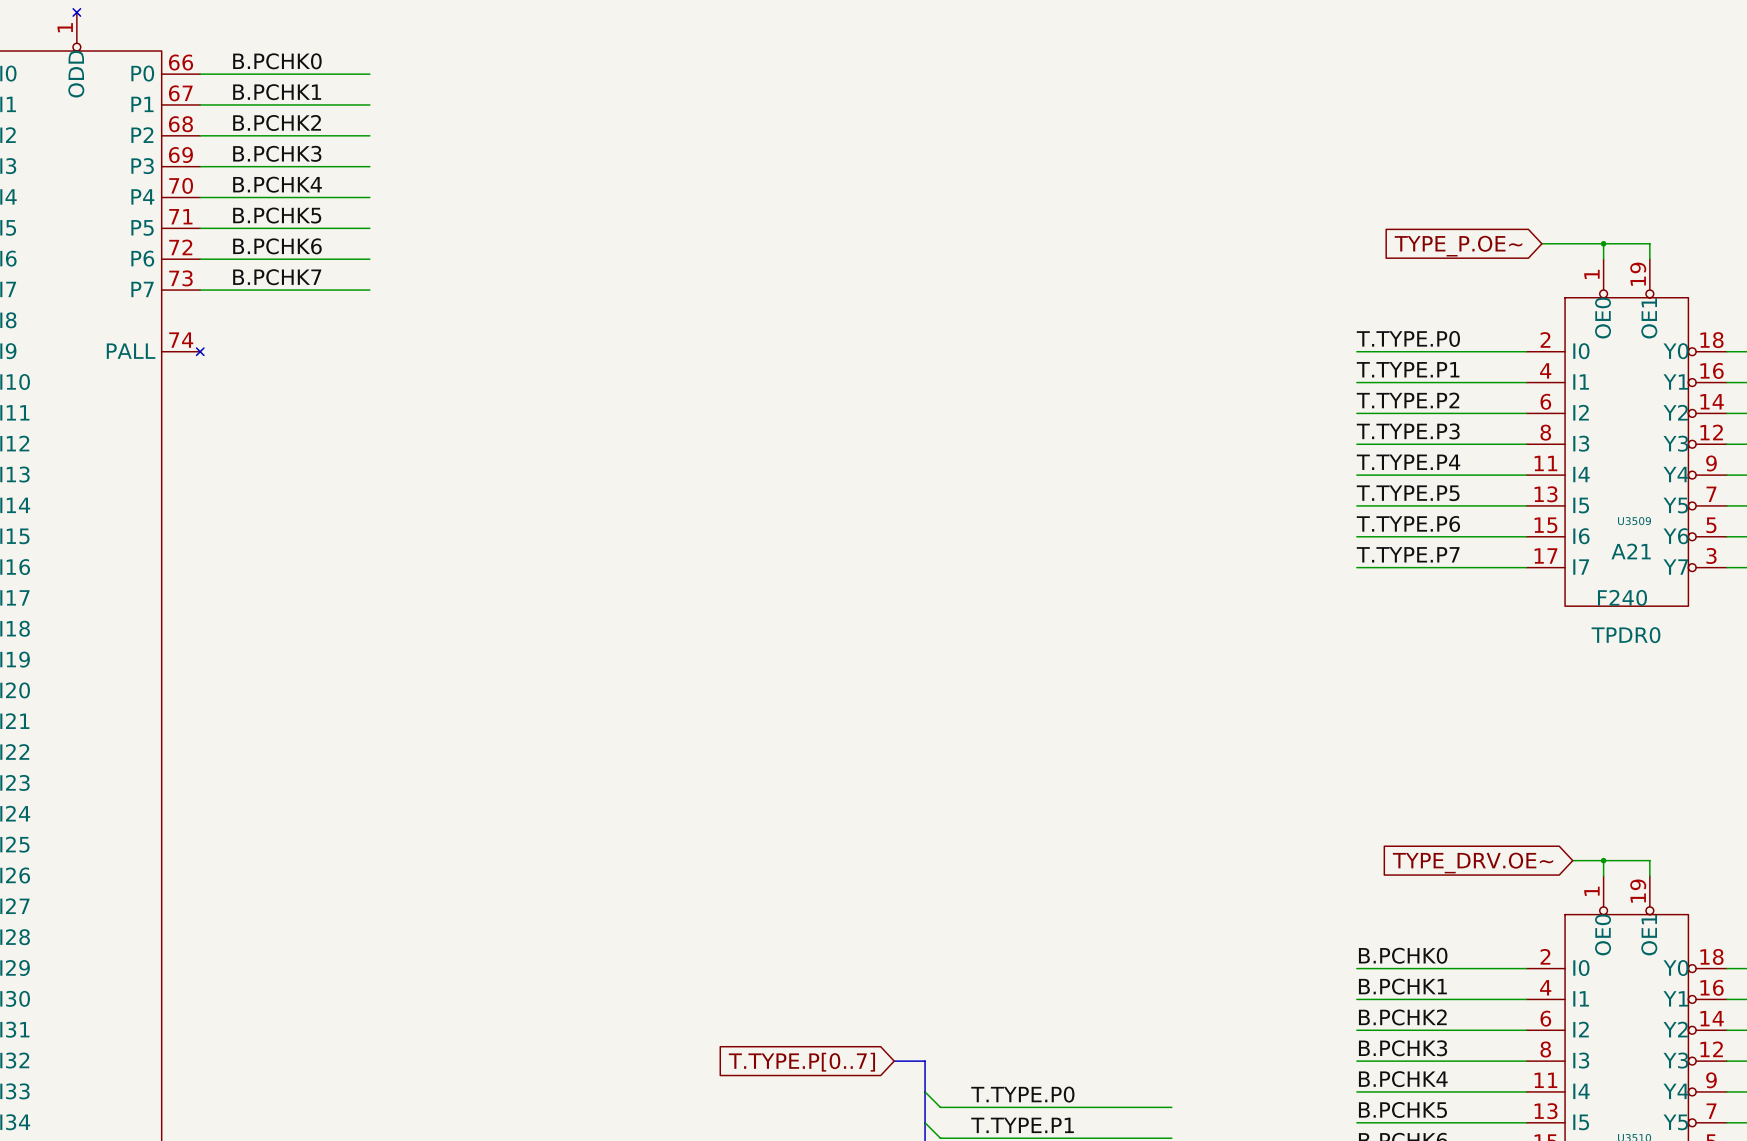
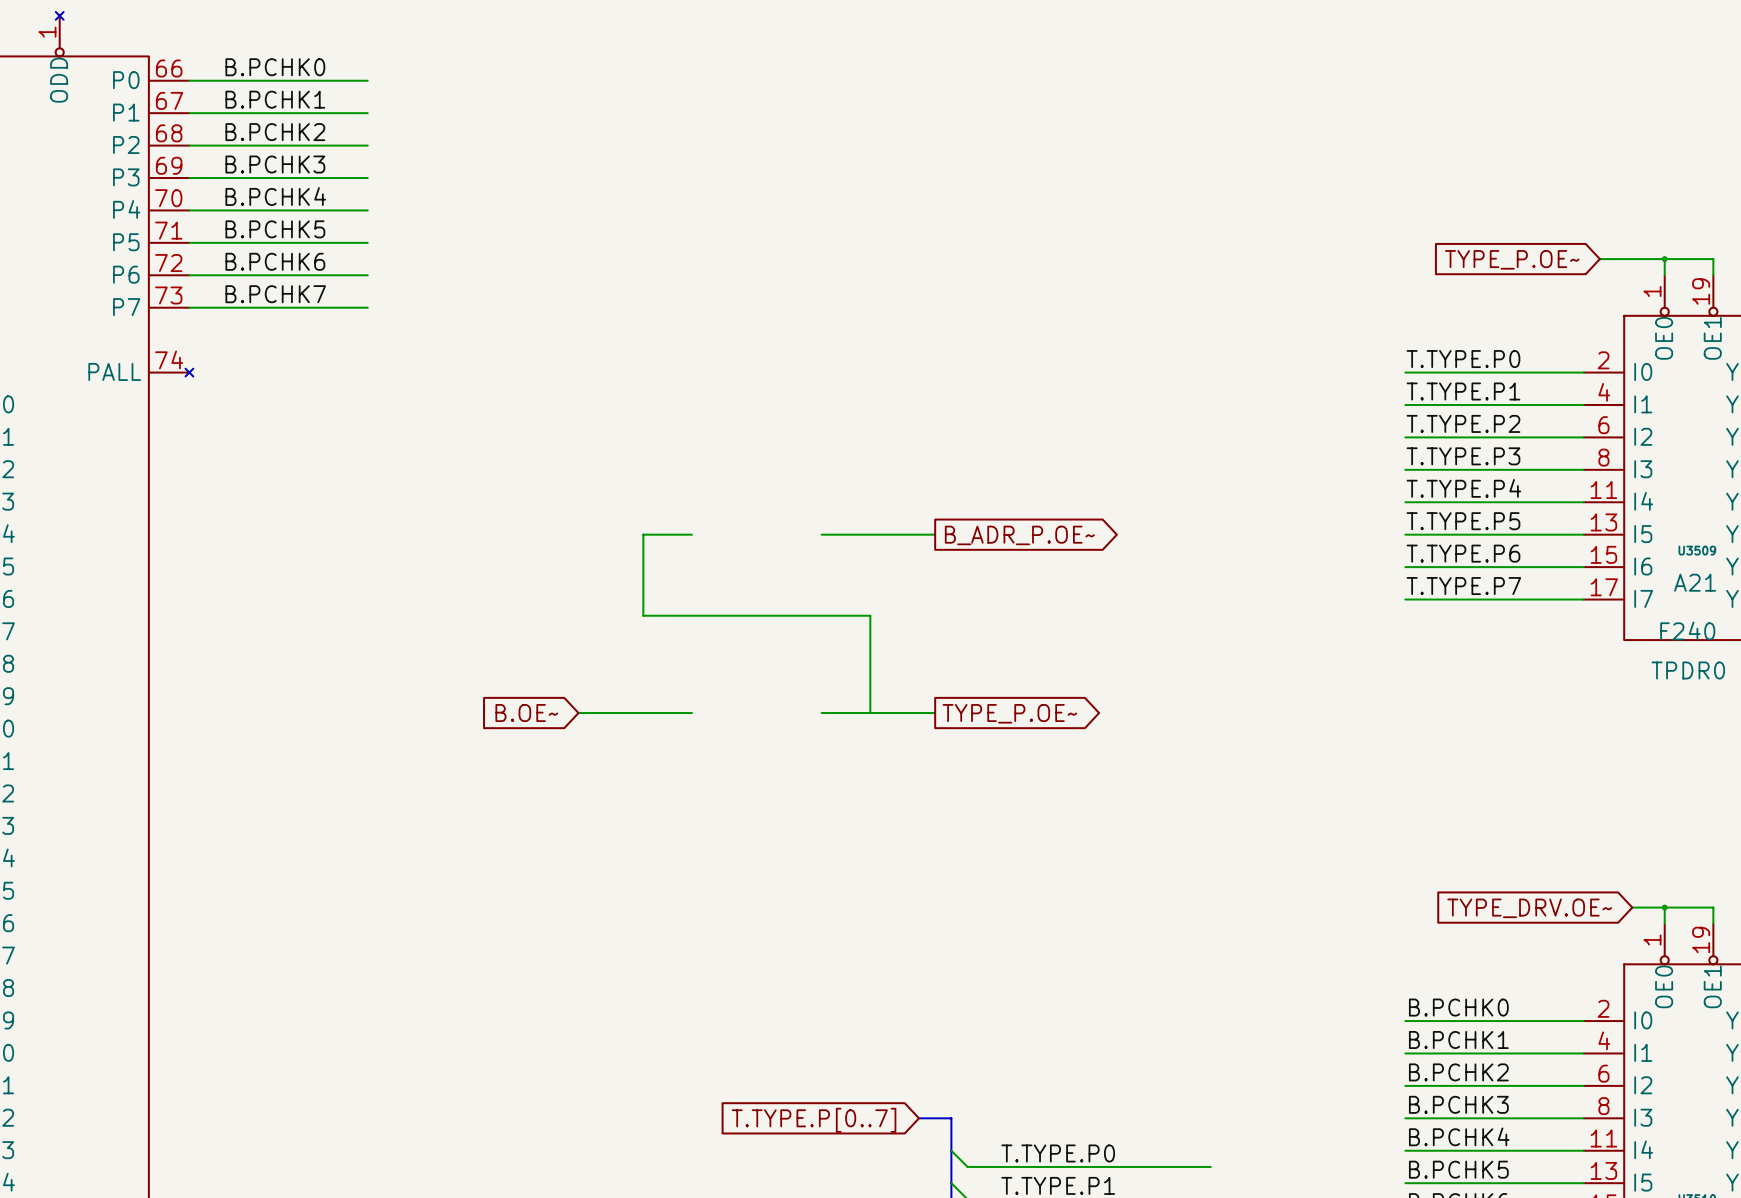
wire: none -> (691, 534) (643, 534) (643, 615) (870, 615) (870, 713)
wire: none -> (821, 534) (935, 534)
global label: none -> B_ADR_P.OE~ (1019, 535)
global label: none -> B.OE~ (526, 713)
wire: none -> (578, 713) (691, 713)
wire: none -> (821, 713) (935, 713)
global label: none -> TYPE_P.OE~ (1009, 713)

